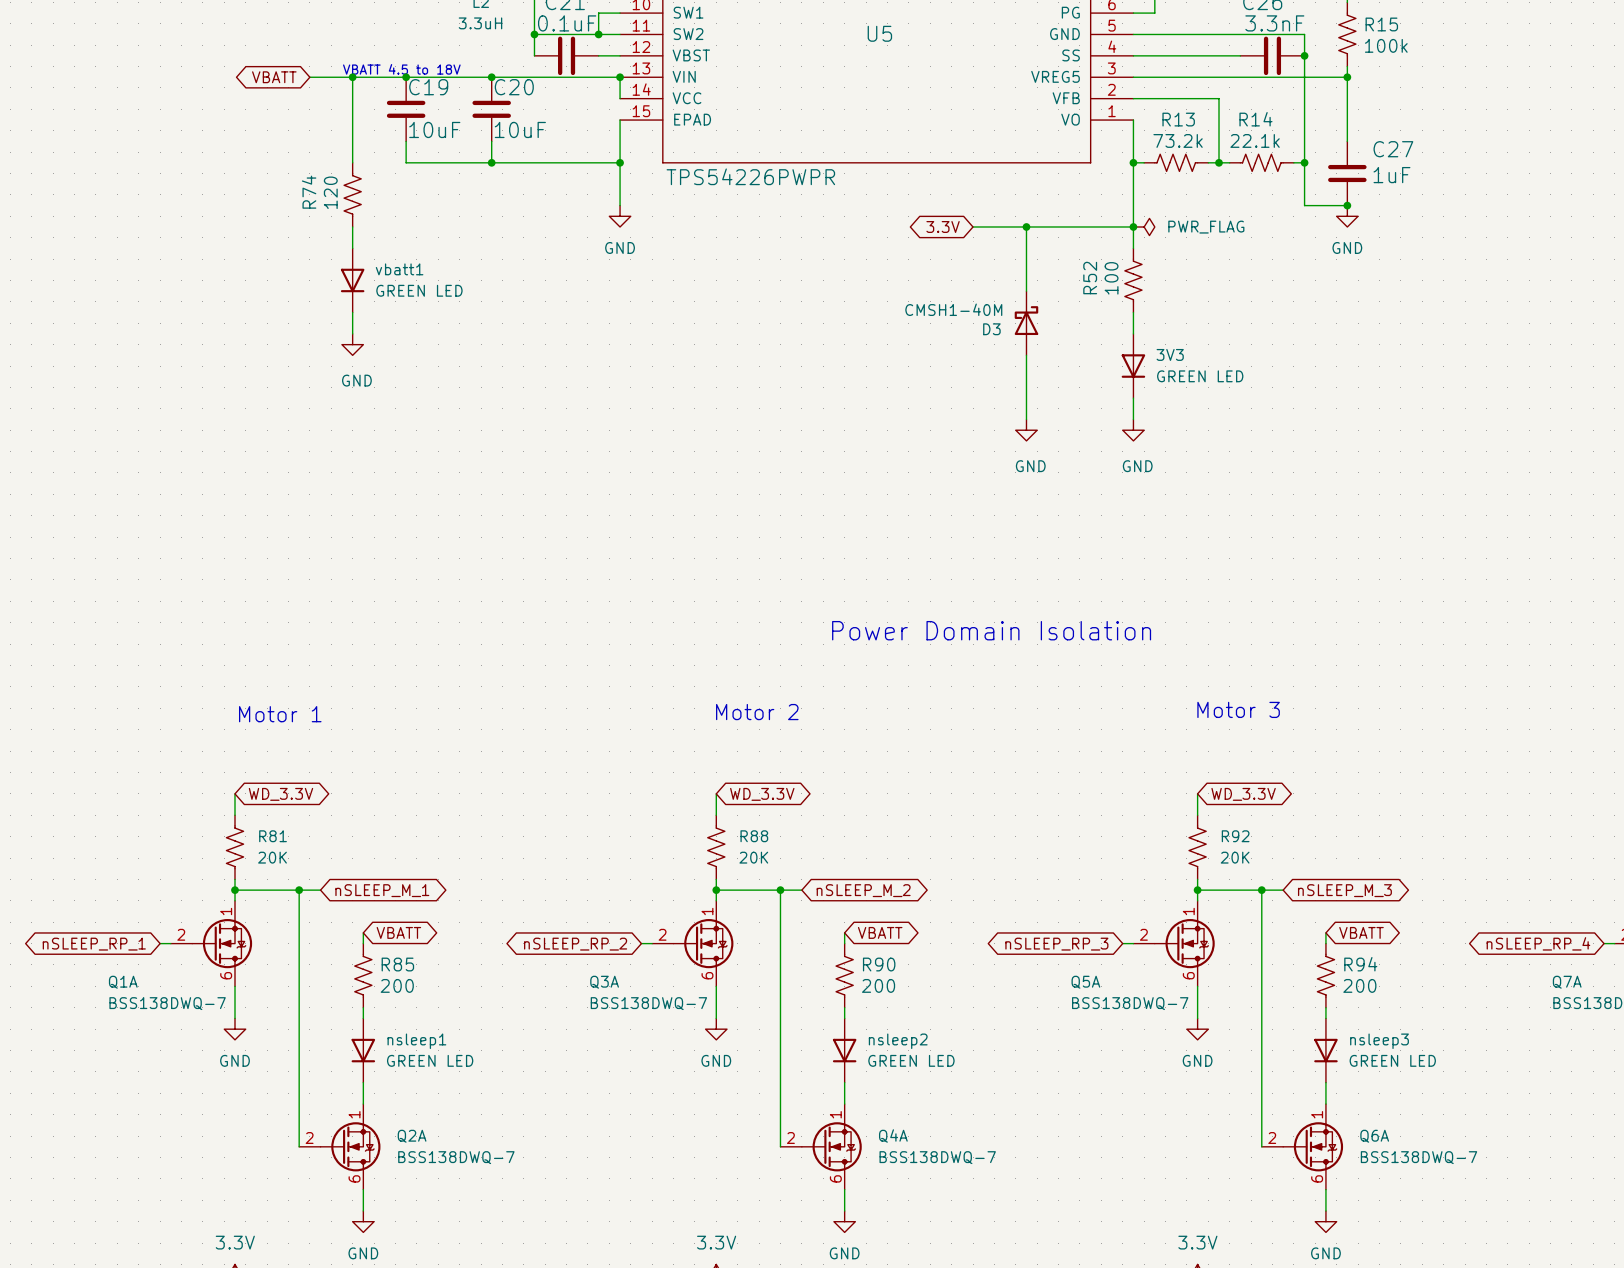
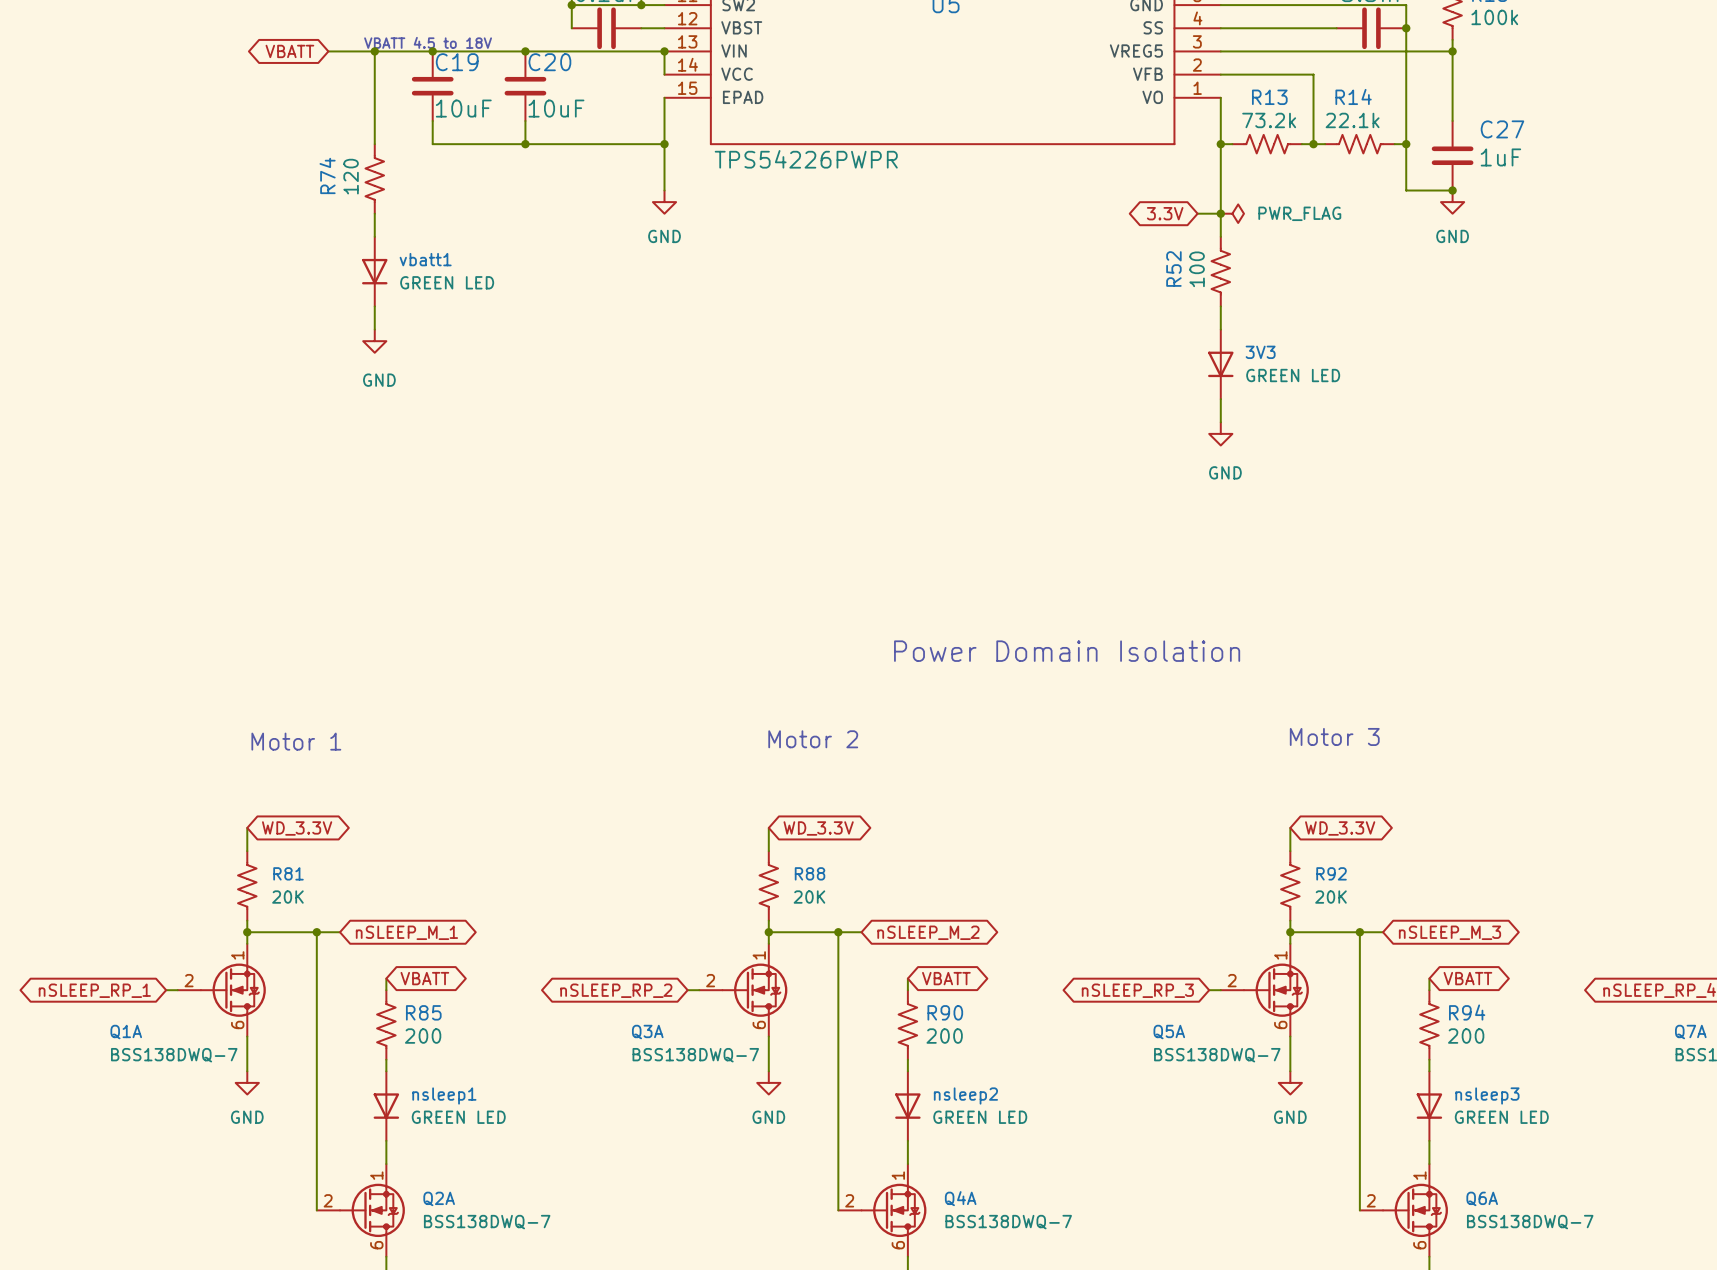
global label position: 3.3V (943, 226) -> 3.3V (1165, 213)
wire: (973, 226) (1112, 226) -> none
wire: (1026, 226) (1026, 291) -> none
junction: (1026, 226) -> none
D3: CMSH1-40M (1026, 323) -> none
wire: (1026, 355) (1026, 419) -> none
power symbol: GND (1026, 430) -> none

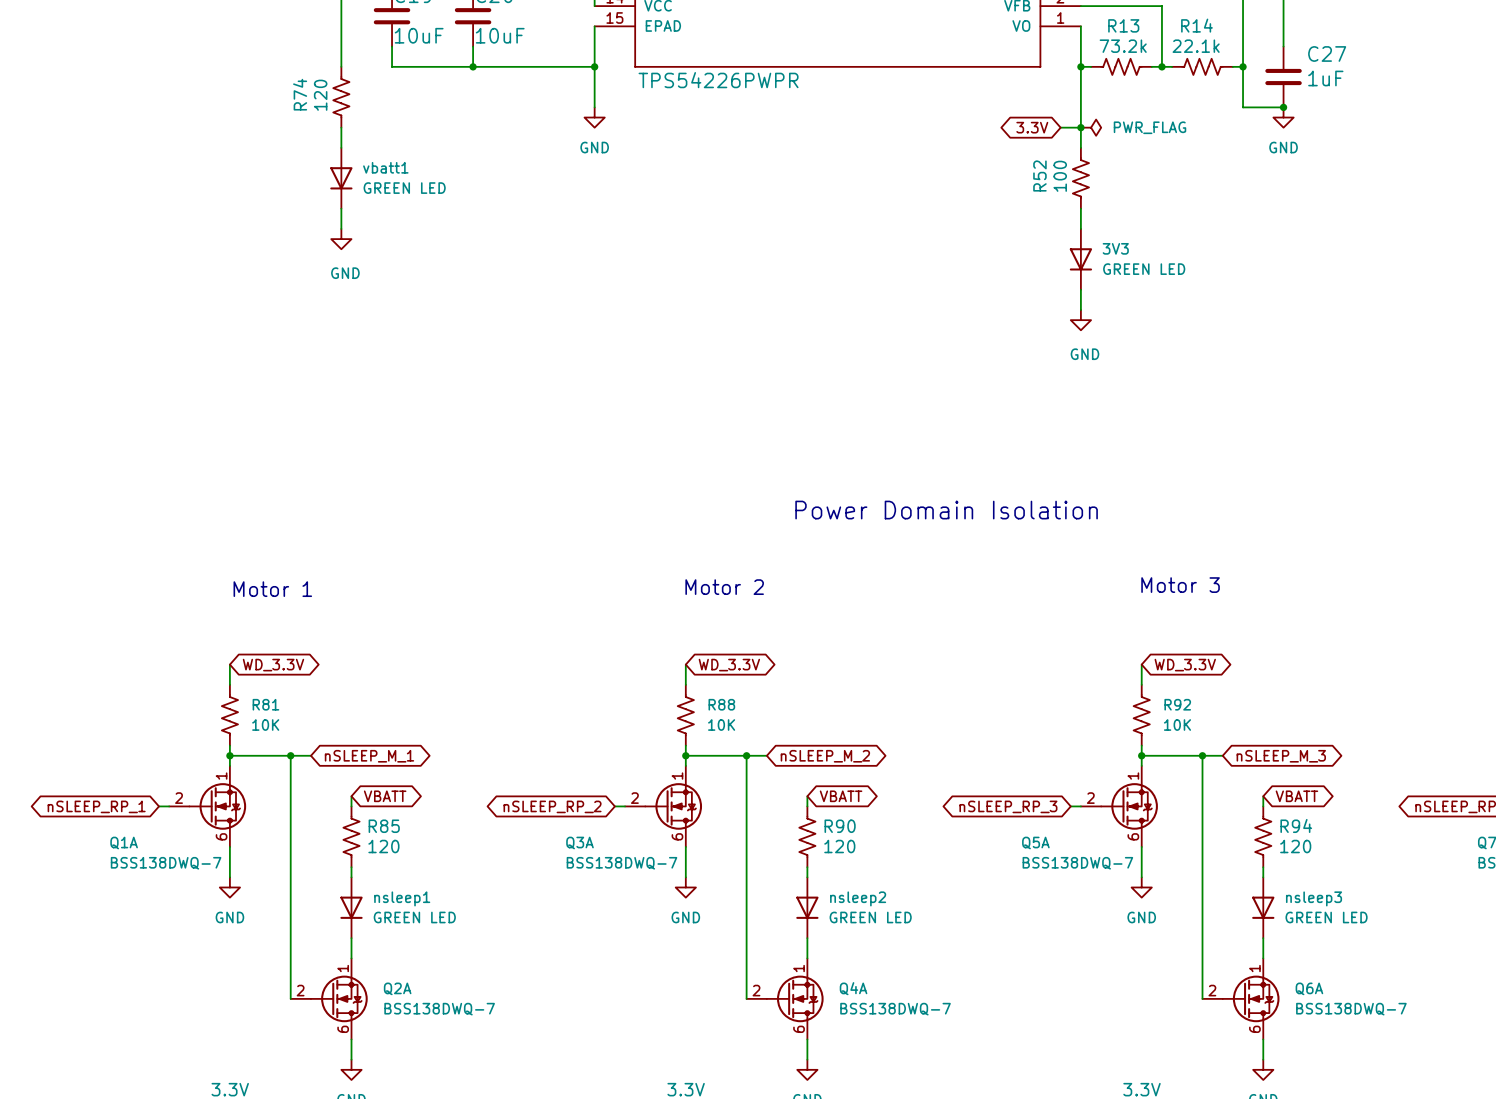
R81 value: 20K (287, 897) -> 10K (265, 725)
R88 value: 20K (809, 897) -> 10K (721, 725)
R92 value: 20K (1330, 897) -> 10K (1177, 725)
R85 value: 200 (423, 1036) -> 120 (383, 846)
R90 value: 200 (944, 1036) -> 120 (839, 846)
R94 value: 200 (1466, 1036) -> 120 (1295, 846)

